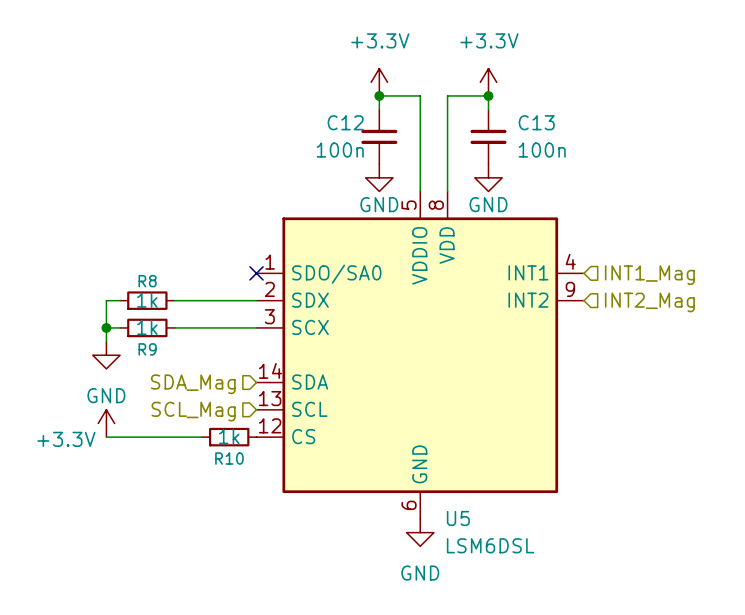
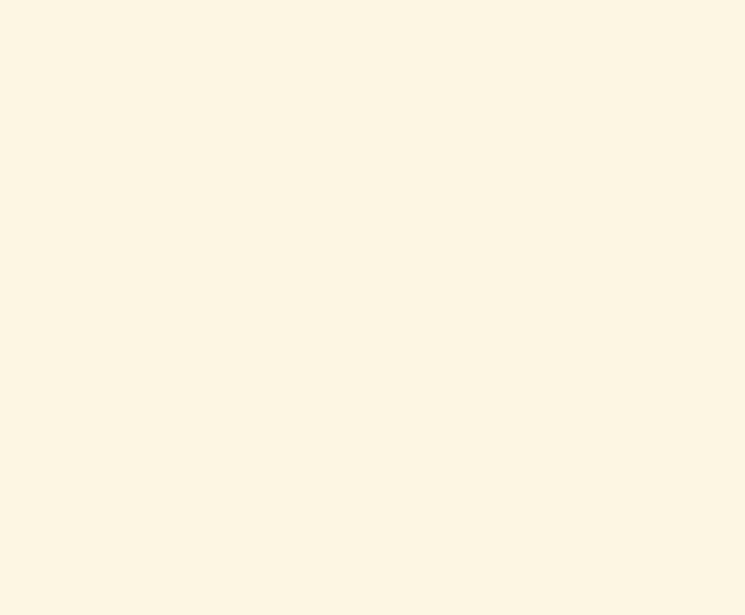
power symbol: +3.3V (379, 82) -> none
power symbol: +3.3V (488, 82) -> none
junction: (379, 95) -> none
junction: (488, 95) -> none
wire: (379, 109) (379, 95) (420, 95) (420, 191) -> none
wire: (488, 109) (488, 95) (447, 95) (447, 191) -> none
C12: 100n (379, 136) -> none
C13: 100n (488, 136) -> none
power symbol: GND (379, 177) -> none
power symbol: GND (488, 177) -> none
no-connect mark: (256, 273) -> none
hierarchical label: INT1_Mag (649, 275) -> none
wire: (120, 300) (106, 300) (106, 341) -> none
R8: 1k (147, 300) -> none
wire: (174, 300) (256, 300) -> none
hierarchical label: INT2_Mag (649, 302) -> none
wire: (106, 327) (120, 327) -> none
junction: (106, 327) -> none
R9: 1k (147, 327) -> none
wire: (174, 327) (256, 327) -> none
power symbol: GND (106, 355) -> none
U5: LSM6DSL (420, 355) -> none
hierarchical label: SDA_Mag (193, 384) -> none
hierarchical label: SCL_Mag (193, 411) -> none
power symbol: +3.3V (106, 423) -> none
wire: (106, 437) (201, 437) -> none
R10: 1k (229, 437) -> none
power symbol: GND (420, 532) -> none

